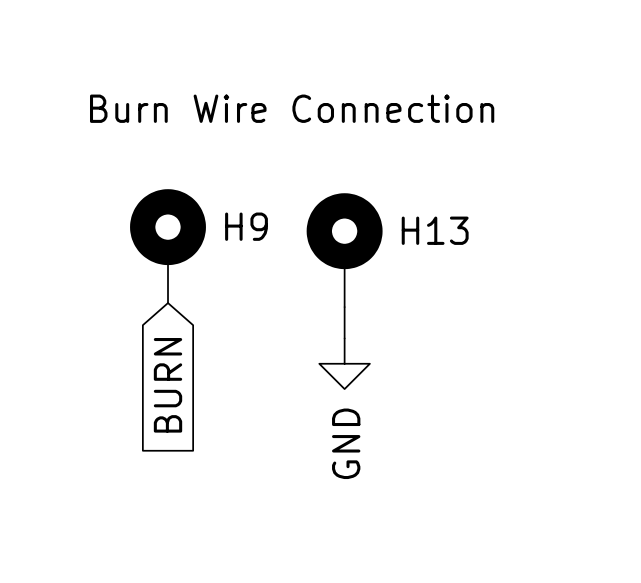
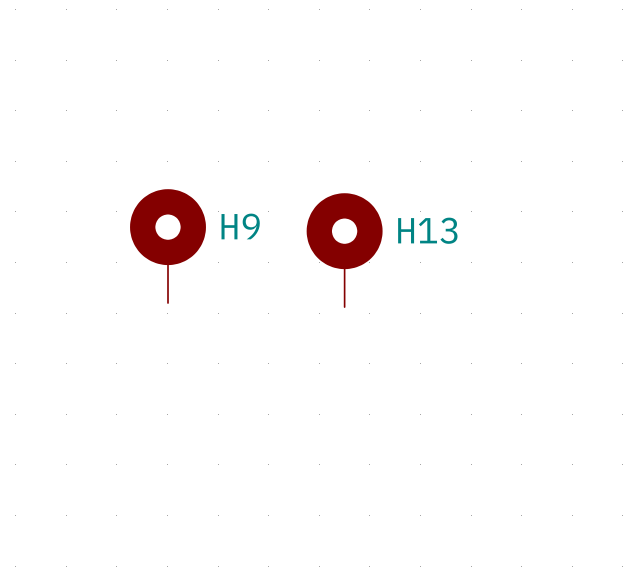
text: Burn Wire Connection (292, 108) -> none
wire: (344, 307) (344, 338) -> none
power symbol: GND (344, 363) -> none
global label: BURN (168, 385) -> none

